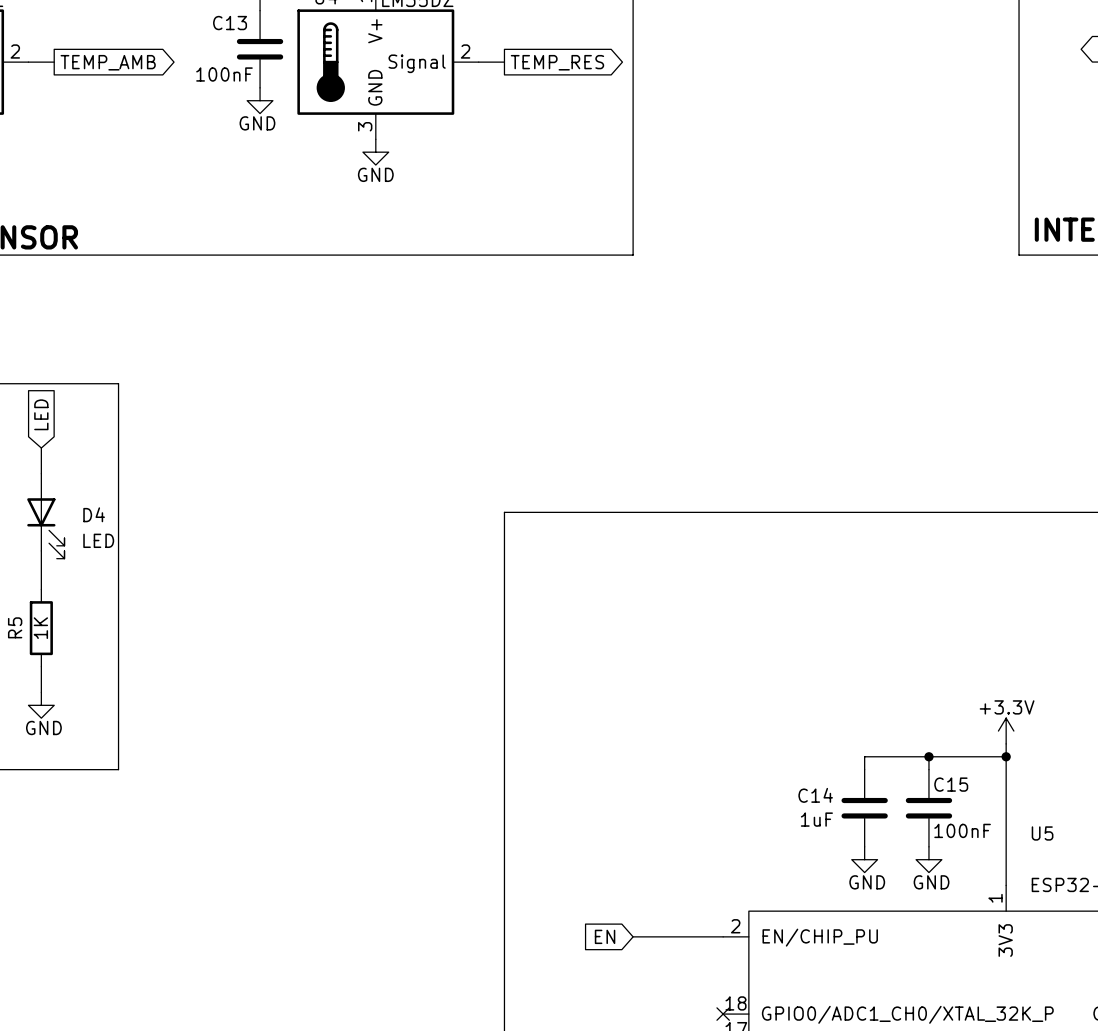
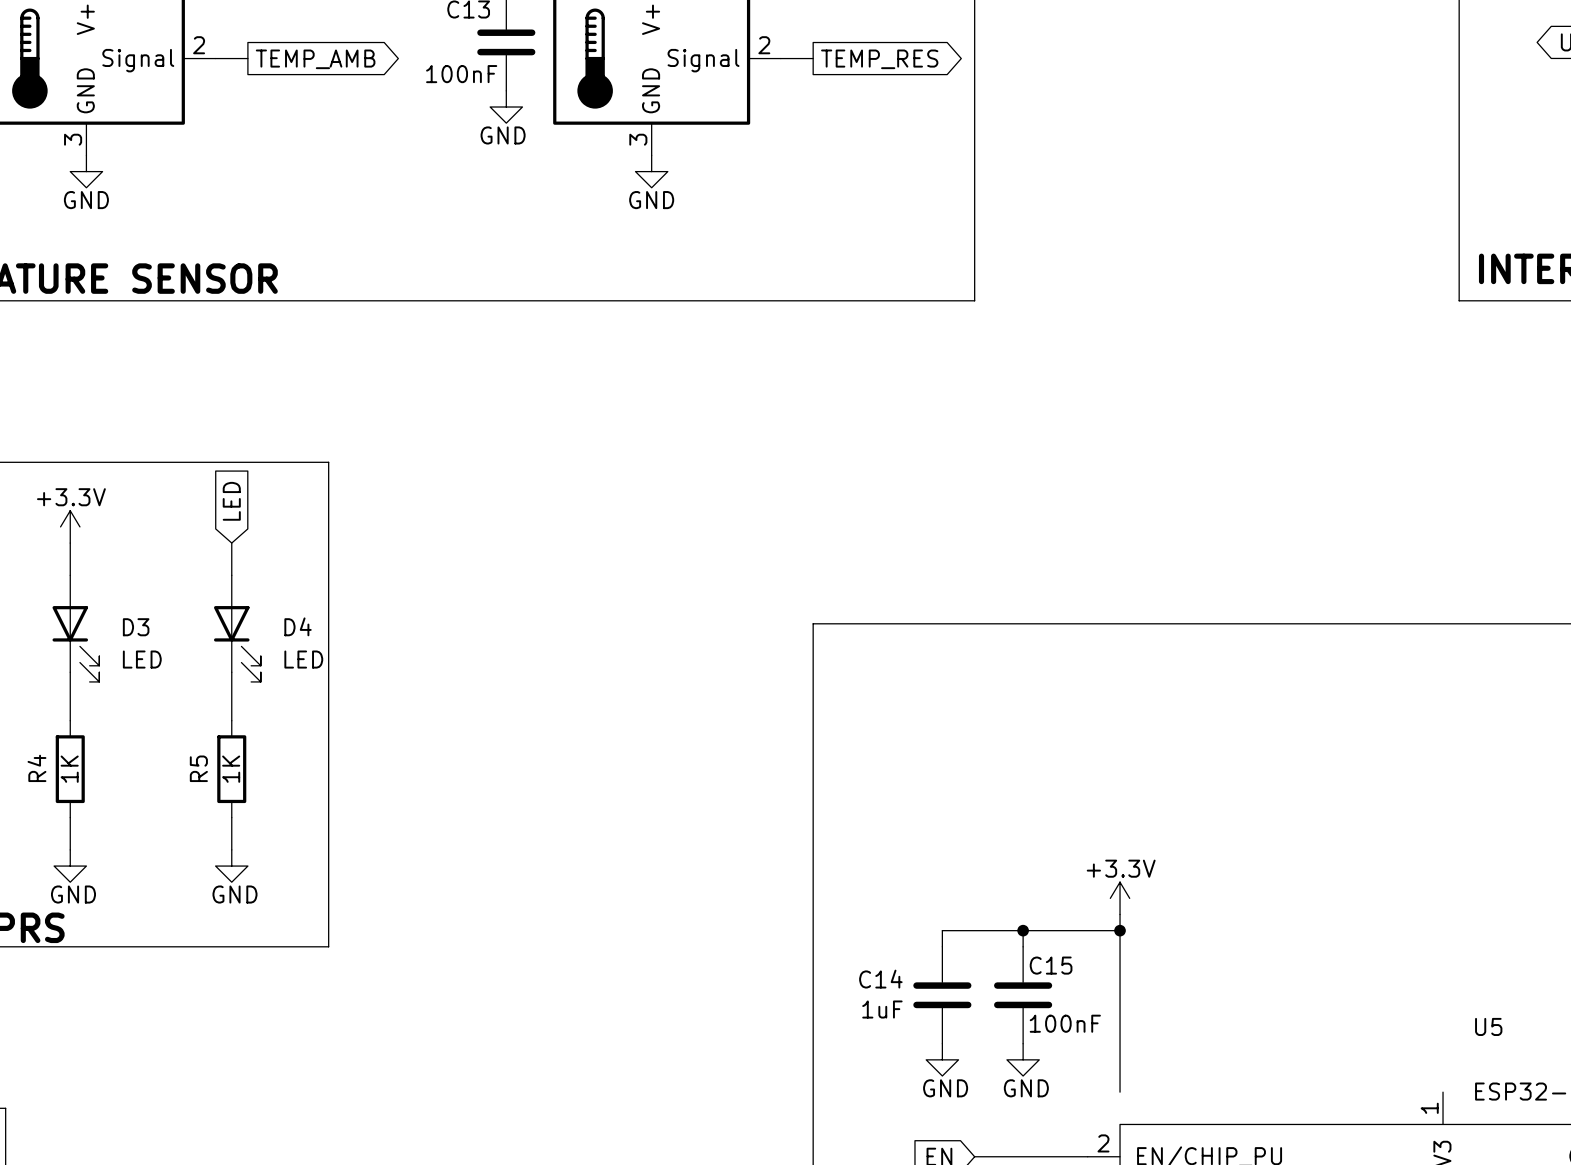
power symbol: none -> +3.3V (1120, 898)
power symbol: +3.3V (1006, 731) -> none
wire: none -> (1120, 914) (1120, 1092)
wire: (1006, 743) (1006, 885) -> none
wire: none -> (1023, 930) (1023, 946)
junction: none -> (1023, 930)
wire: none -> (1120, 930) (942, 930) (942, 946)
junction: none -> (1120, 930)
wire: (928, 756) (928, 769) -> none
junction: (928, 756) -> none
wire: (1006, 756) (864, 756) (864, 769) -> none
junction: (1006, 756) -> none
C14 position: (864, 808) -> (942, 995)
C15 position: (928, 808) -> (1023, 995)
power symbol: none -> GND (942, 1059)
power symbol: none -> GND (1023, 1059)
power symbol: GND (864, 859) -> none
power symbol: GND (928, 859) -> none

